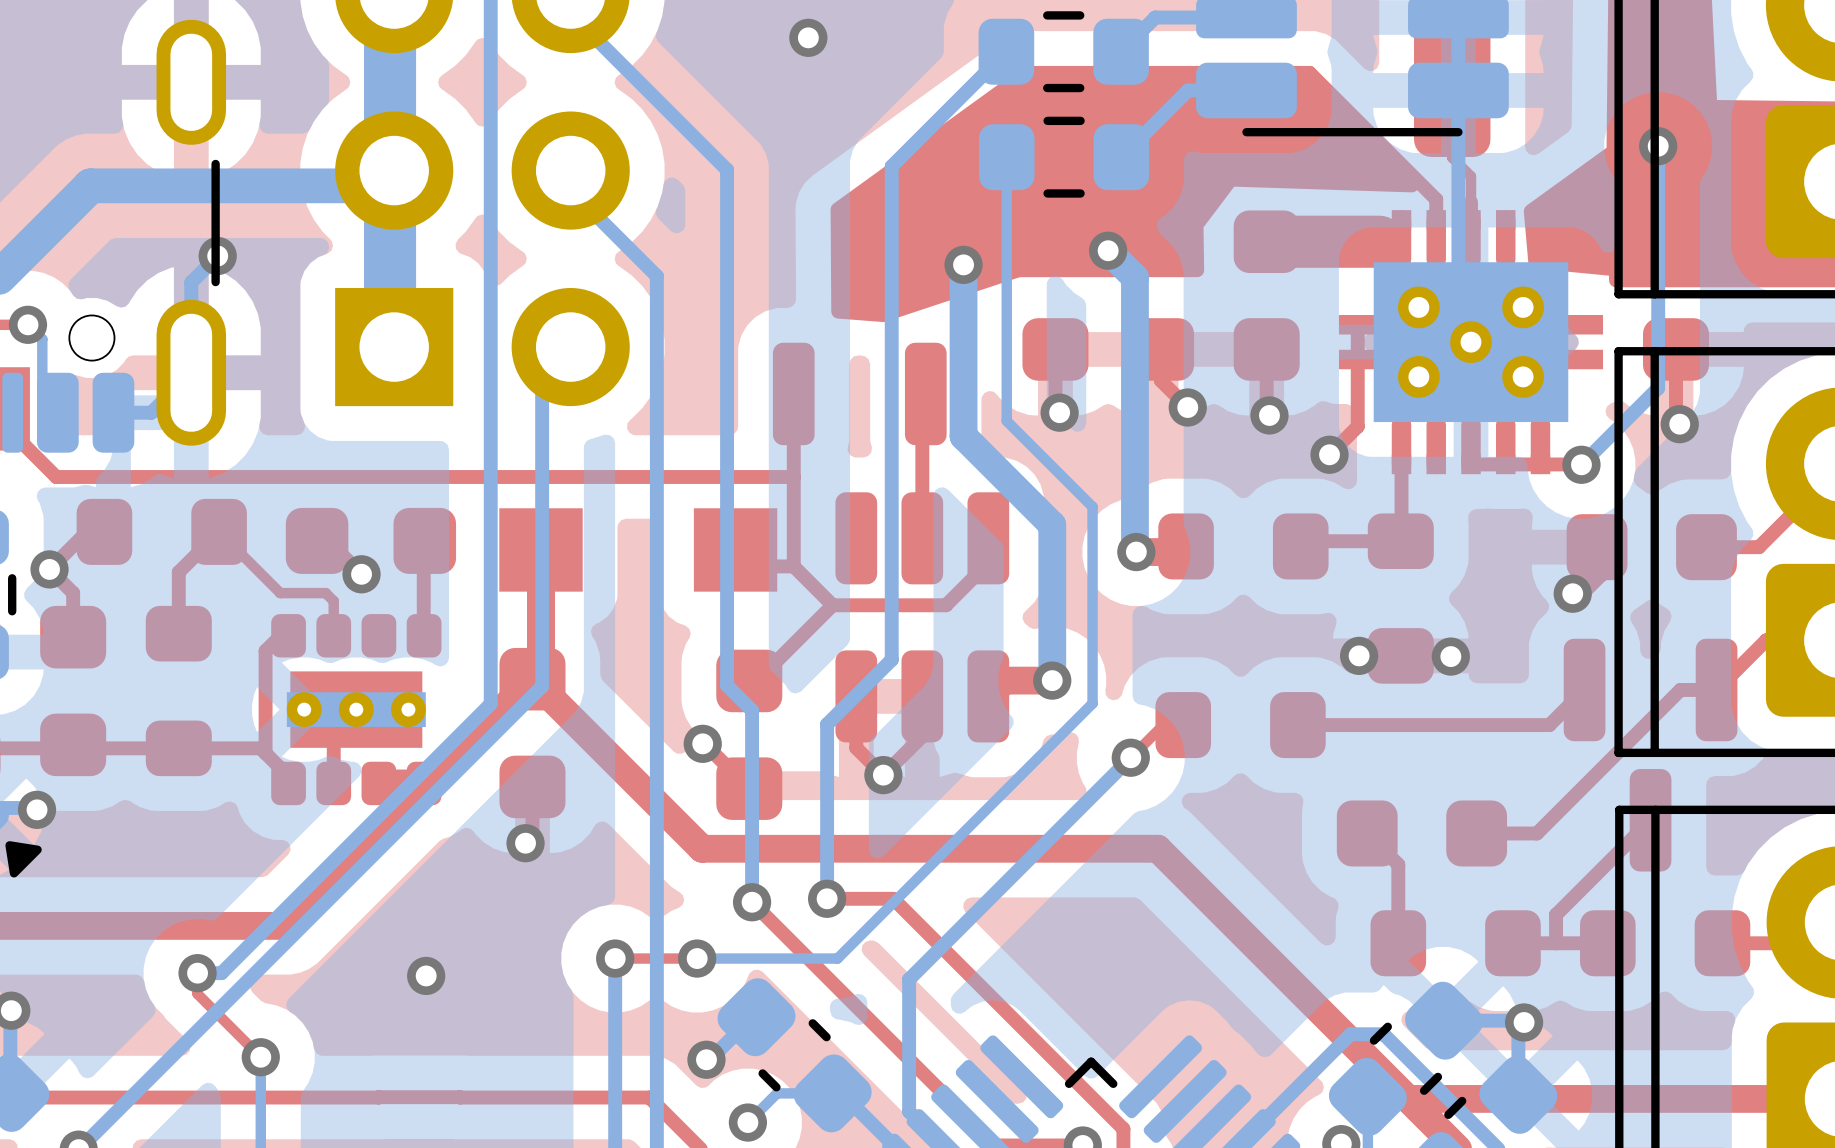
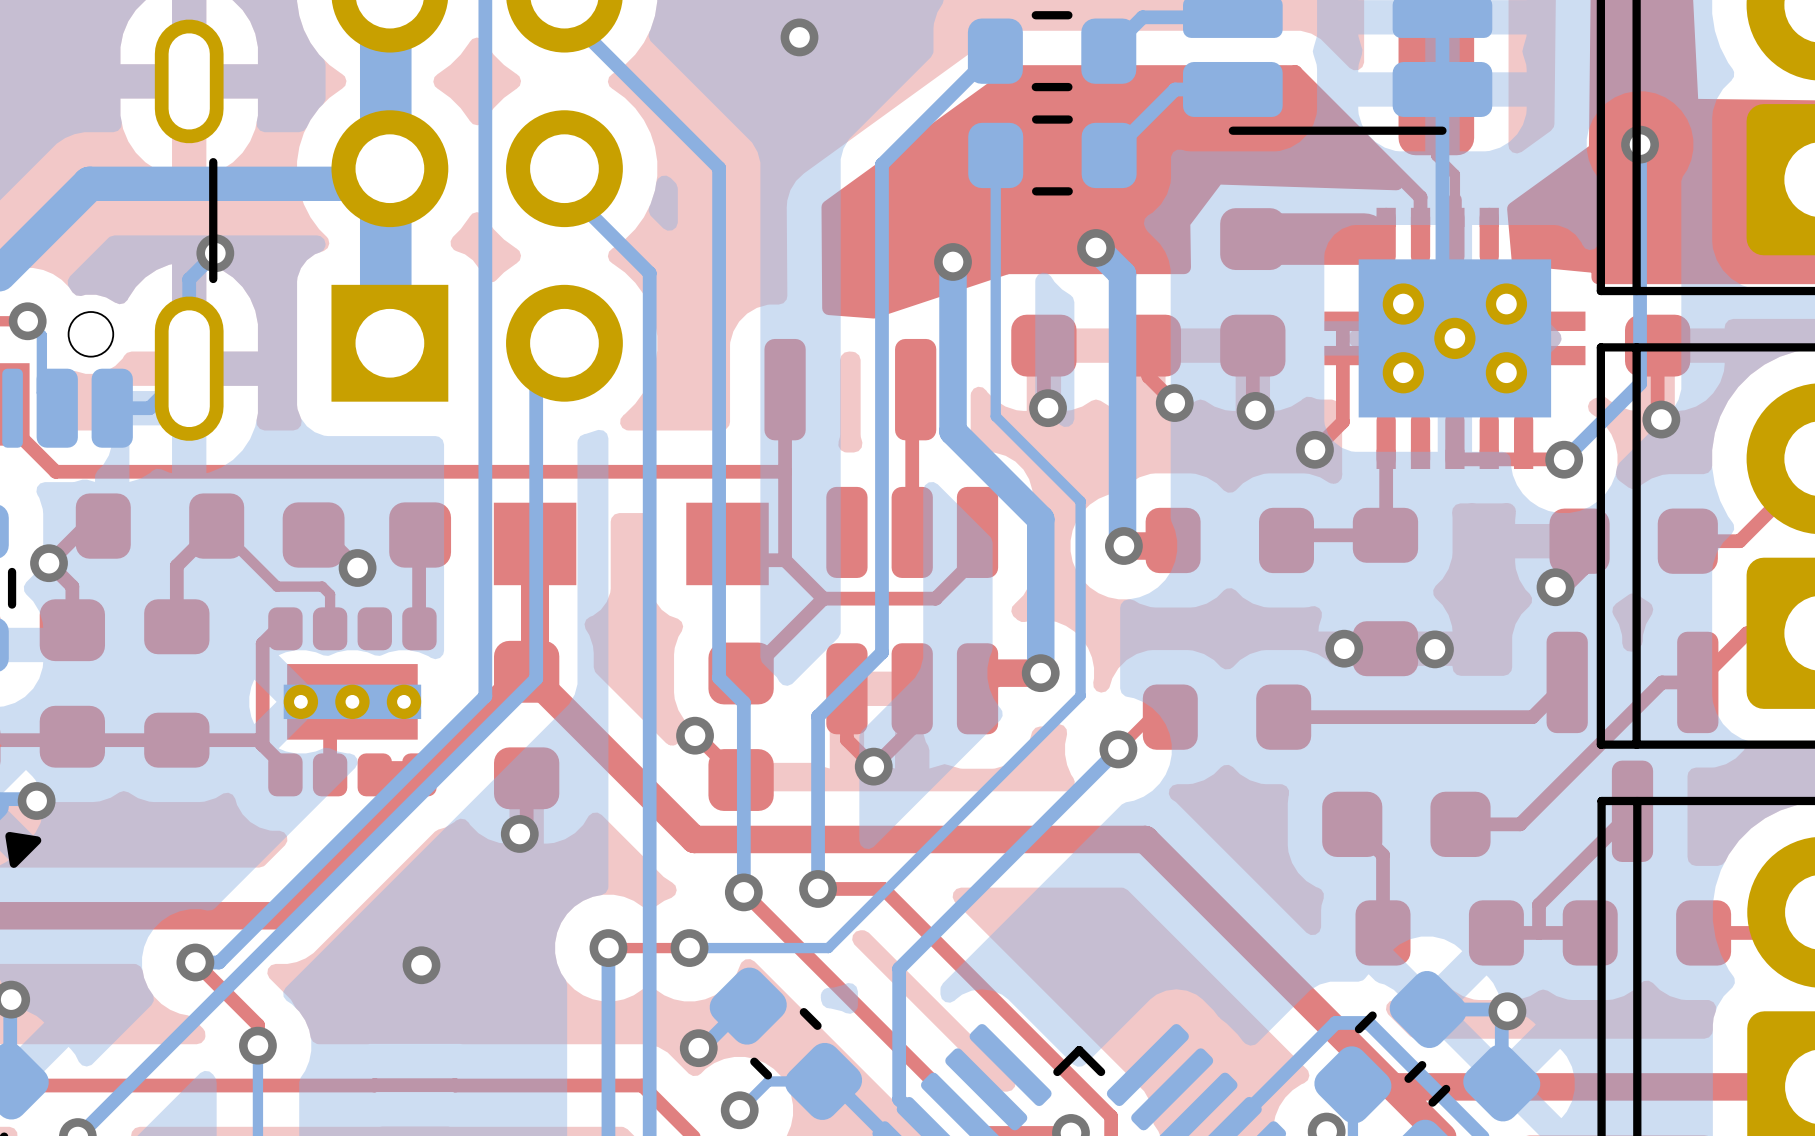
top track: (197, 973) (197, 993) (260, 1057) -> (195, 962) (257, 1025) (257, 1045)

